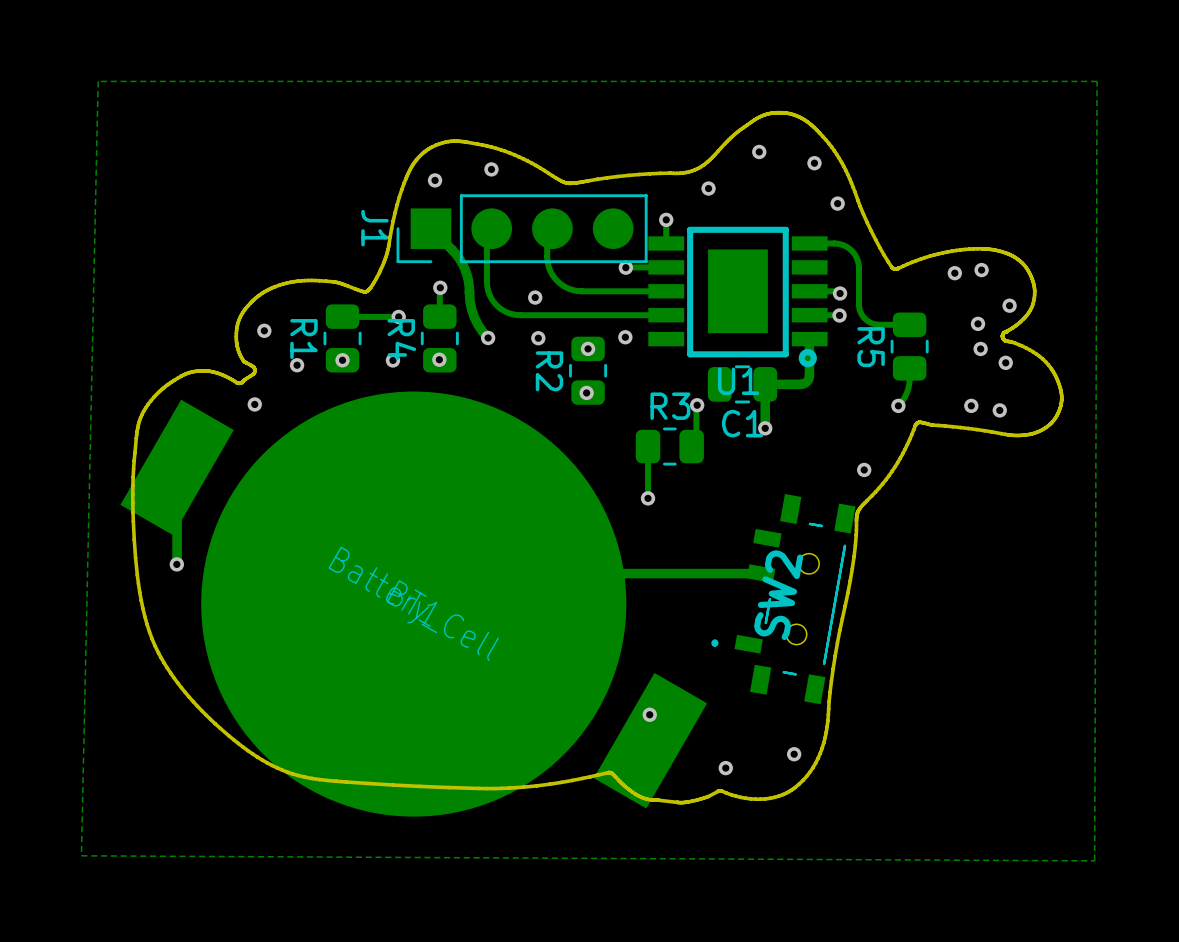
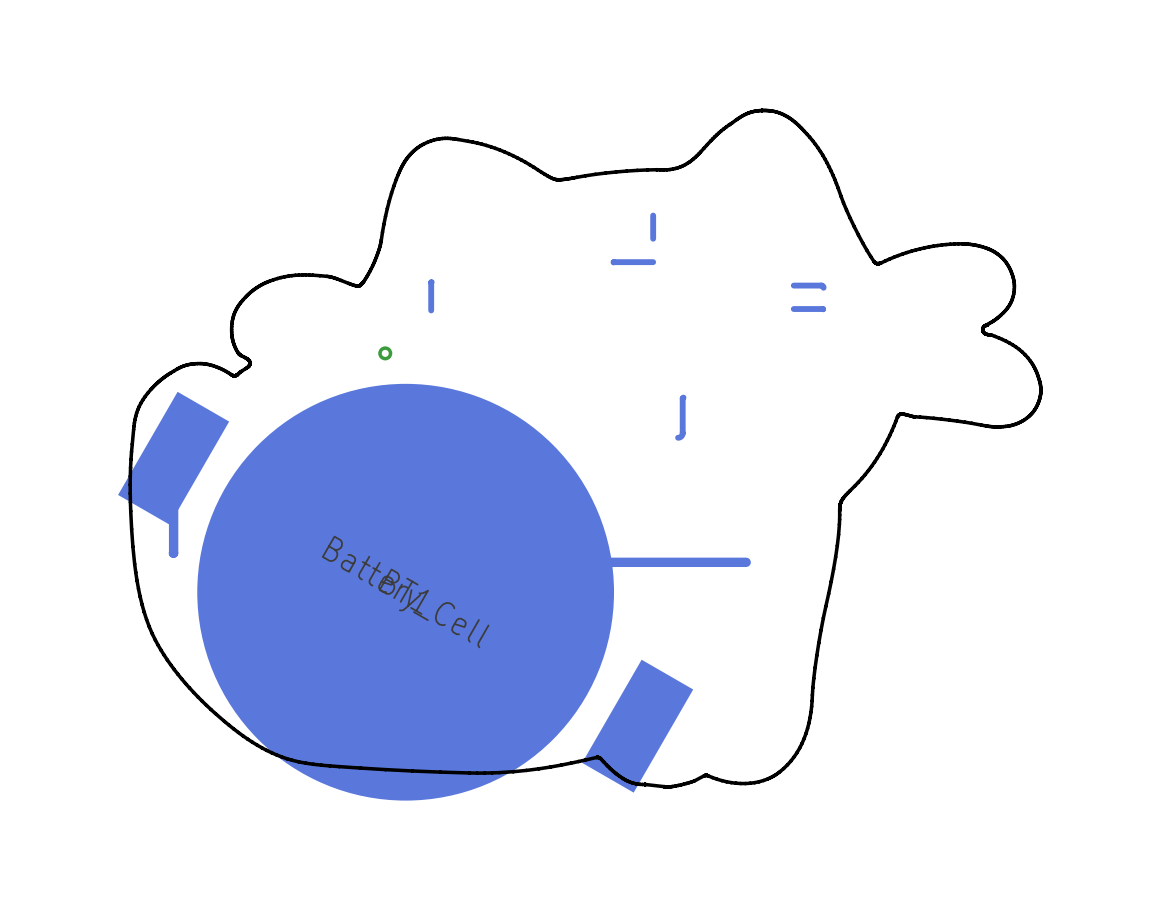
zone outline: (1097, 81) (98, 81) (81, 855) (1094, 860) (1097, 81) -> none
via: (759, 151) -> none
via: (814, 163) -> none
via: (491, 169) -> none
via: (435, 180) -> none
via: (708, 188) -> none
via: (837, 203) -> none
via: (666, 219) -> none
track: (430, 228) (455, 254) (462, 263) (468, 280) (470, 301) (474, 317) (488, 337) -> none
track: (491, 228) (486, 233) (487, 286) (493, 302) (503, 310) (520, 315) (666, 315) -> none
J1: (522, 228) -> none
track: (552, 228) (547, 233) (548, 265) (554, 277) (564, 286) (581, 291) (666, 291) -> none
track: (809, 243) (839, 244) (853, 252) (858, 265) (859, 306) (861, 314) (866, 320) (876, 324) (909, 324) -> none
via: (625, 267) -> none
via: (981, 270) -> none
via: (954, 273) -> none
via: (440, 287) -> none
via: (840, 293) -> none
U1: (737, 296) -> none
via: (535, 297) -> none
via: (1009, 305) -> none
via: (839, 315) -> none
track: (342, 316) (398, 316) -> none
via: (398, 316) -> none
via: (978, 323) -> none
via: (264, 330) -> none
via: (488, 337) -> none
via: (625, 337) -> none
R1: (342, 338) -> none
R4: (439, 338) -> none
via: (538, 338) -> none
track: (809, 339) (809, 376) (806, 381) (801, 384) (765, 384) (765, 428) -> none
R5: (909, 346) -> none
via: (588, 348) -> none
via: (980, 348) -> none
via: (439, 359) -> none
via: (342, 360) -> none
via: (1005, 362) -> none
via: (297, 365) -> none
track: (909, 368) (908, 388) (898, 405) -> none
R2: (588, 370) -> none
C1: (742, 384) -> none
via: (586, 392) -> none
via: (254, 404) -> none
via: (697, 405) -> none
via: (898, 405) -> none
via: (971, 405) -> none
via: (999, 410) -> none
via: (765, 428) -> none
track: (648, 446) (648, 498) -> none
R3: (669, 446) -> none
via: (864, 469) -> none
via: (648, 498) -> none
via: (176, 564) -> none
SW2: (783, 599) -> none
via: (649, 714) -> none
via: (794, 754) -> none
via: (725, 768) -> none

